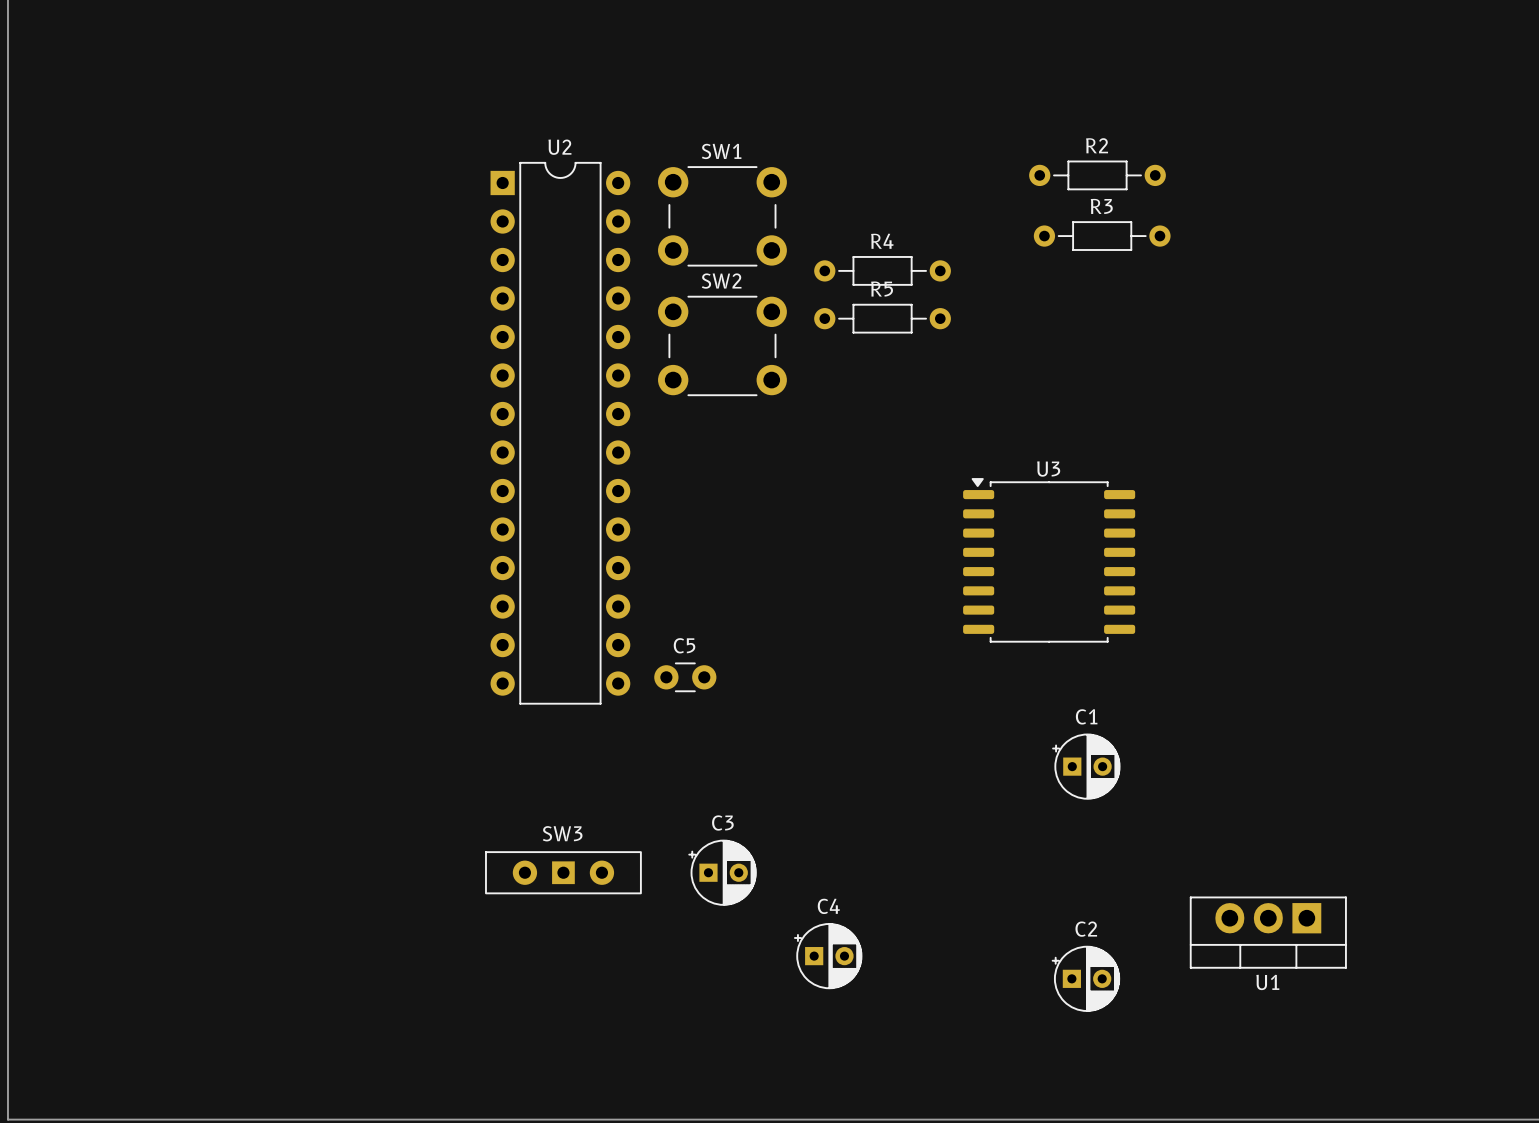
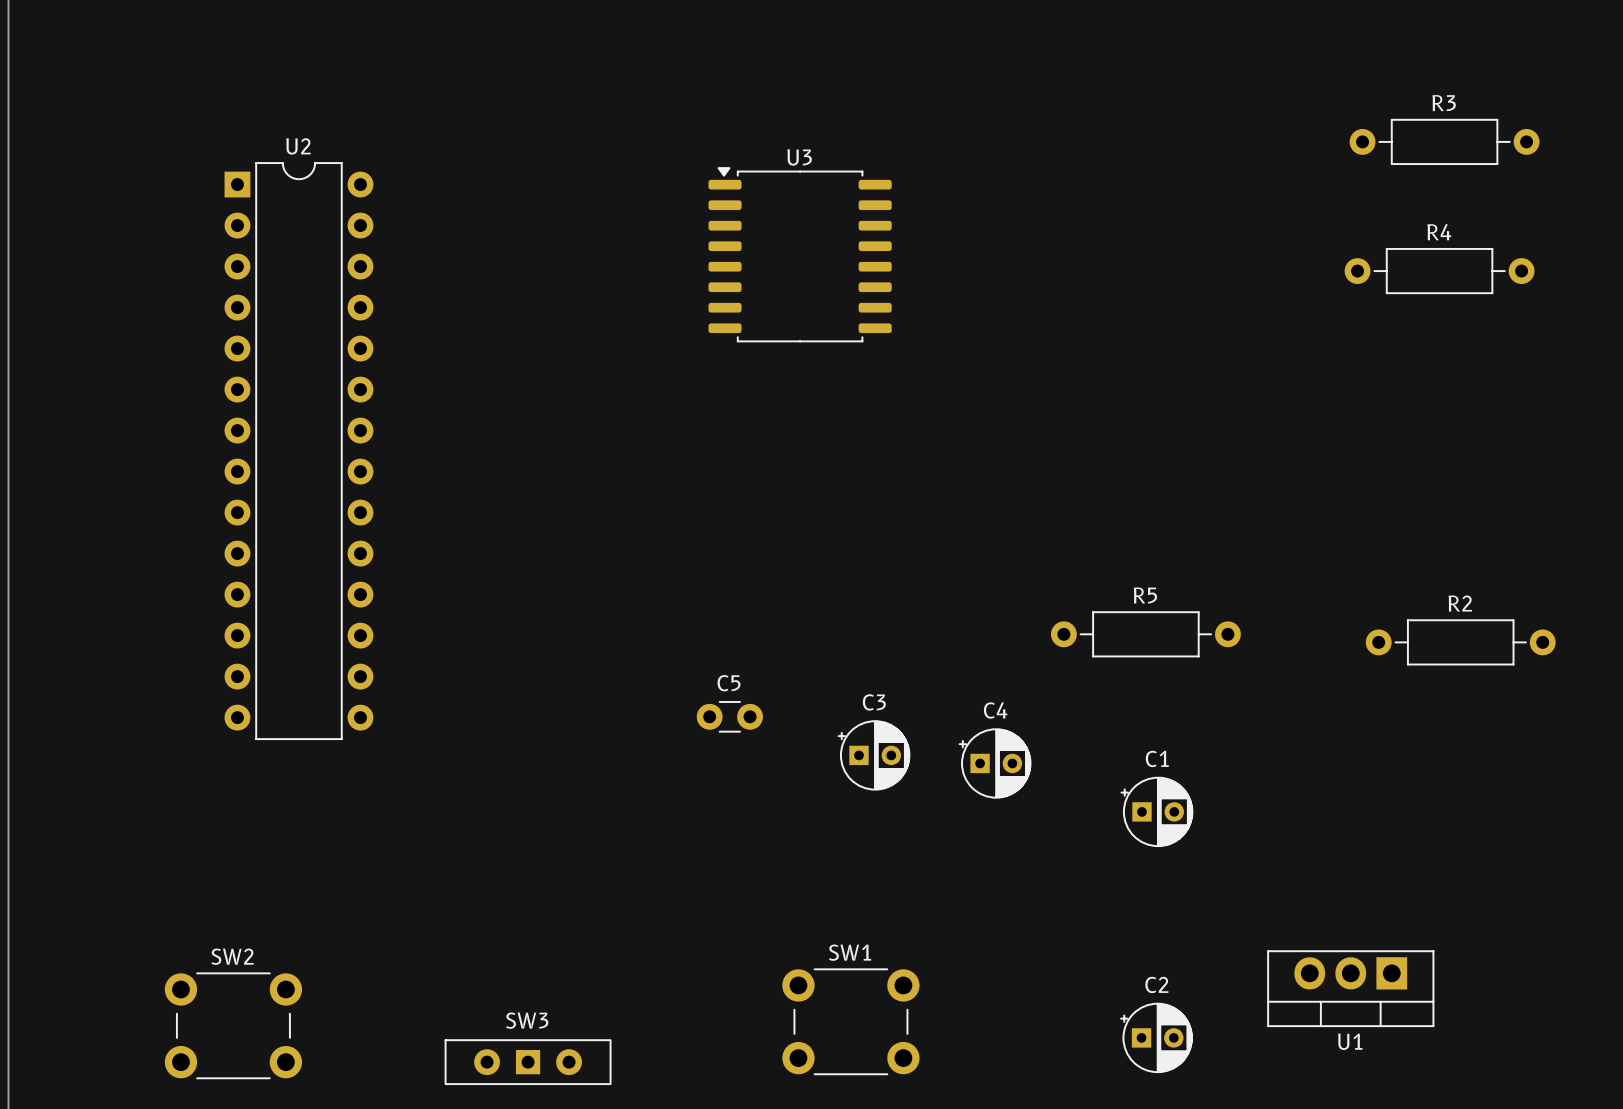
R2 footprint: [1029, 160, 1166, 191] -> [1365, 619, 1556, 666]
SW1 position: (722, 216) -> (850, 1021)
R3 footprint: [1033, 221, 1171, 251] -> [1349, 118, 1540, 166]
R4 footprint: [814, 256, 951, 286] -> [1344, 247, 1535, 295]
R5 footprint: [814, 303, 951, 334] -> [1050, 611, 1241, 658]
SW2 position: (722, 345) -> (233, 1025)
U2 position: (560, 433) -> (298, 451)
U3 position: (1049, 560) -> (800, 254)
SW3 position: (563, 872) -> (528, 1062)
C3 position: (722, 872) -> (873, 755)
C4 position: (828, 956) -> (995, 763)

